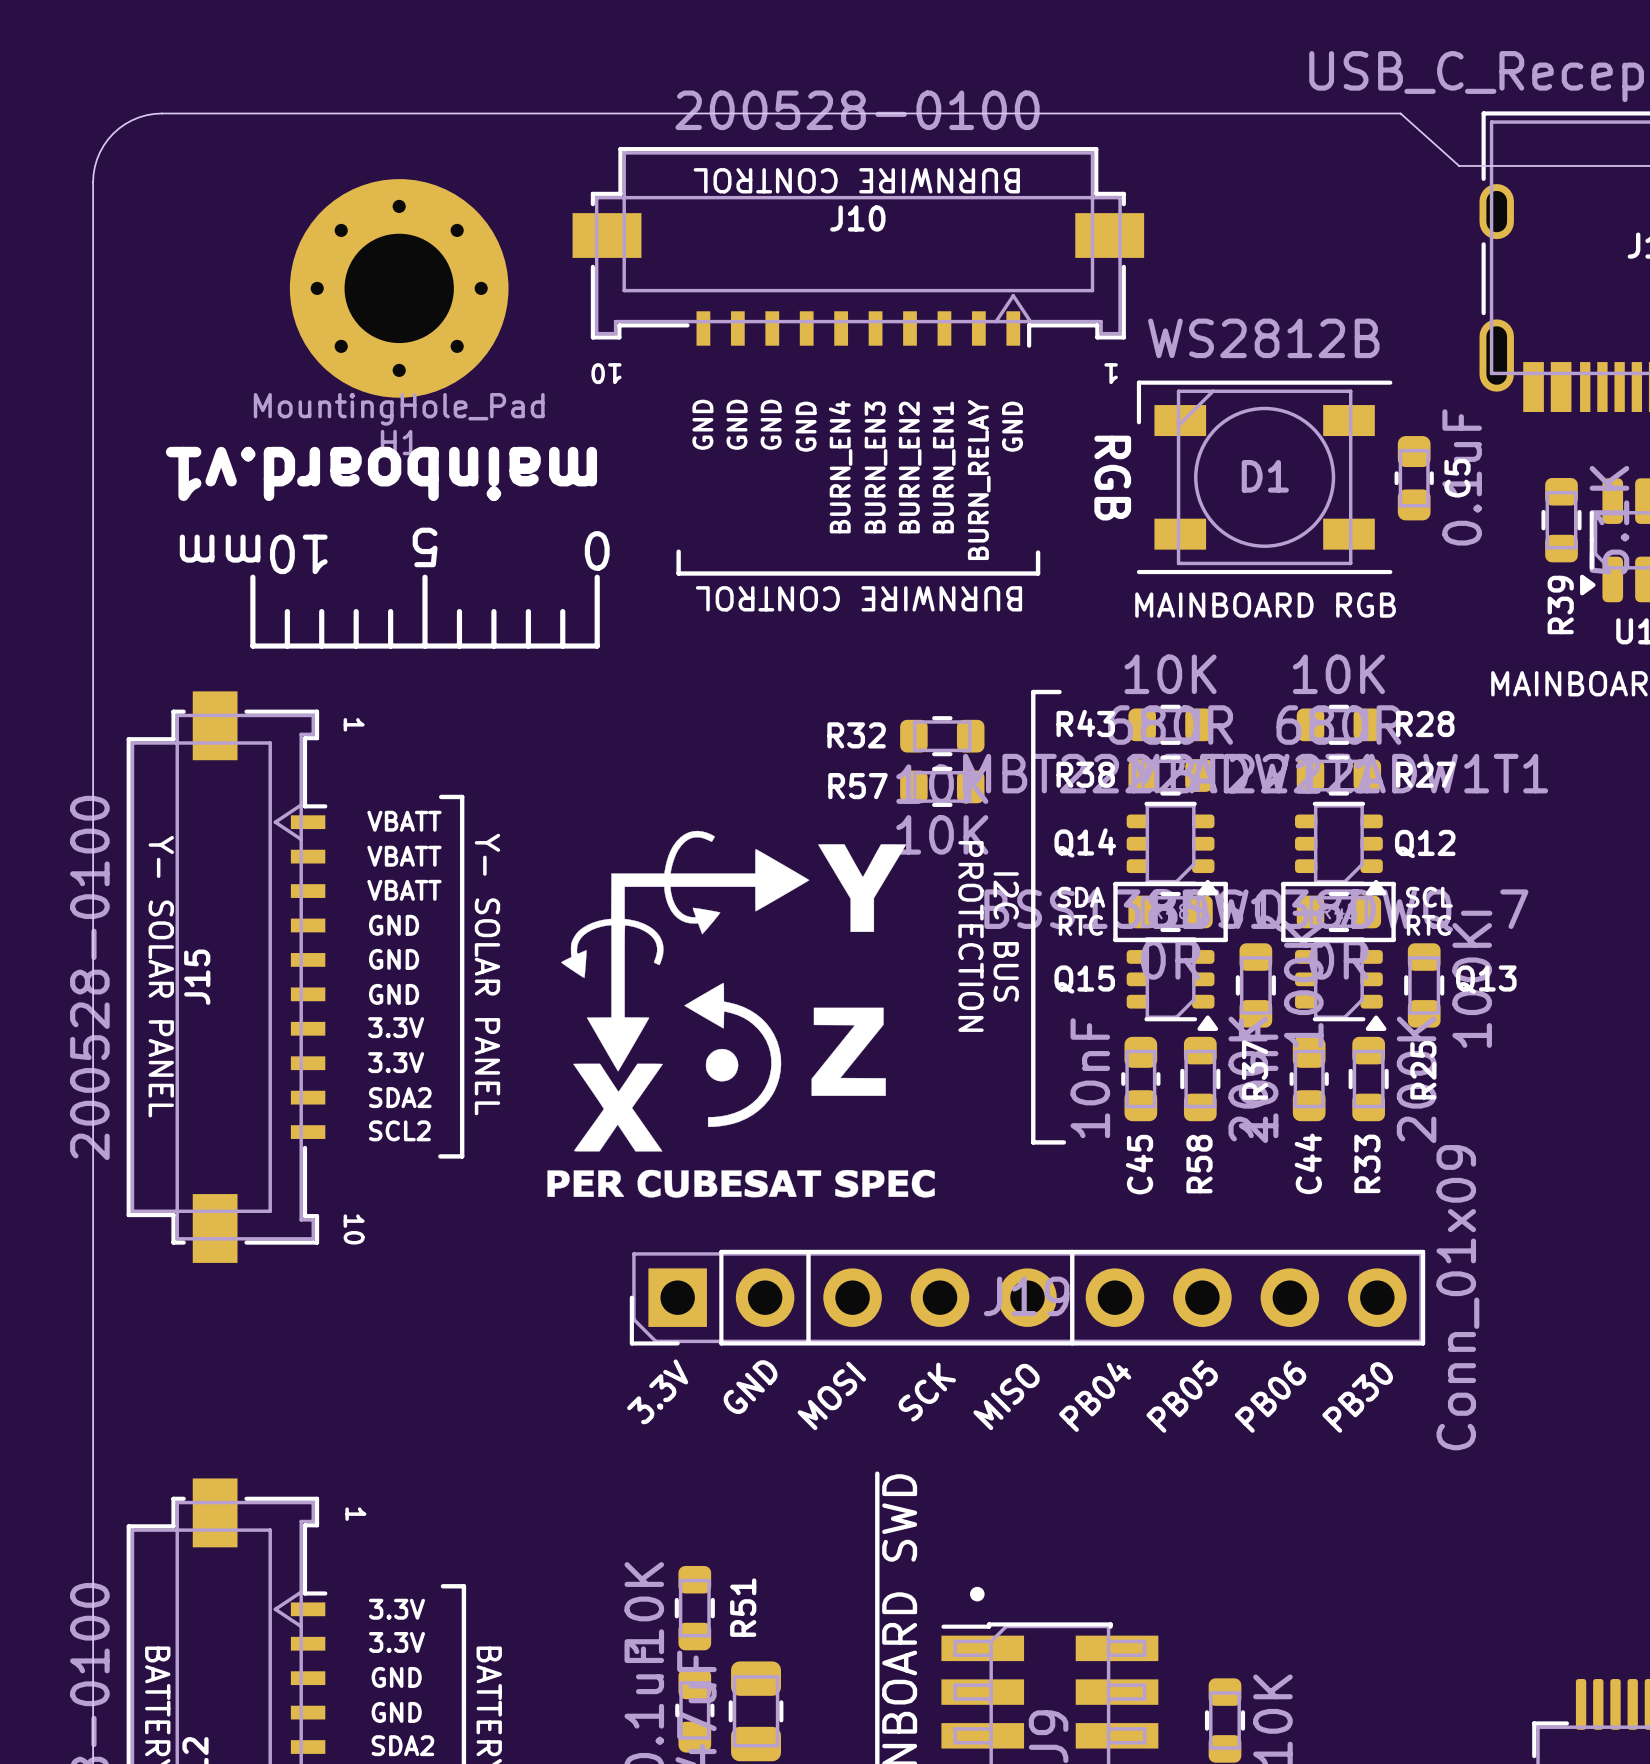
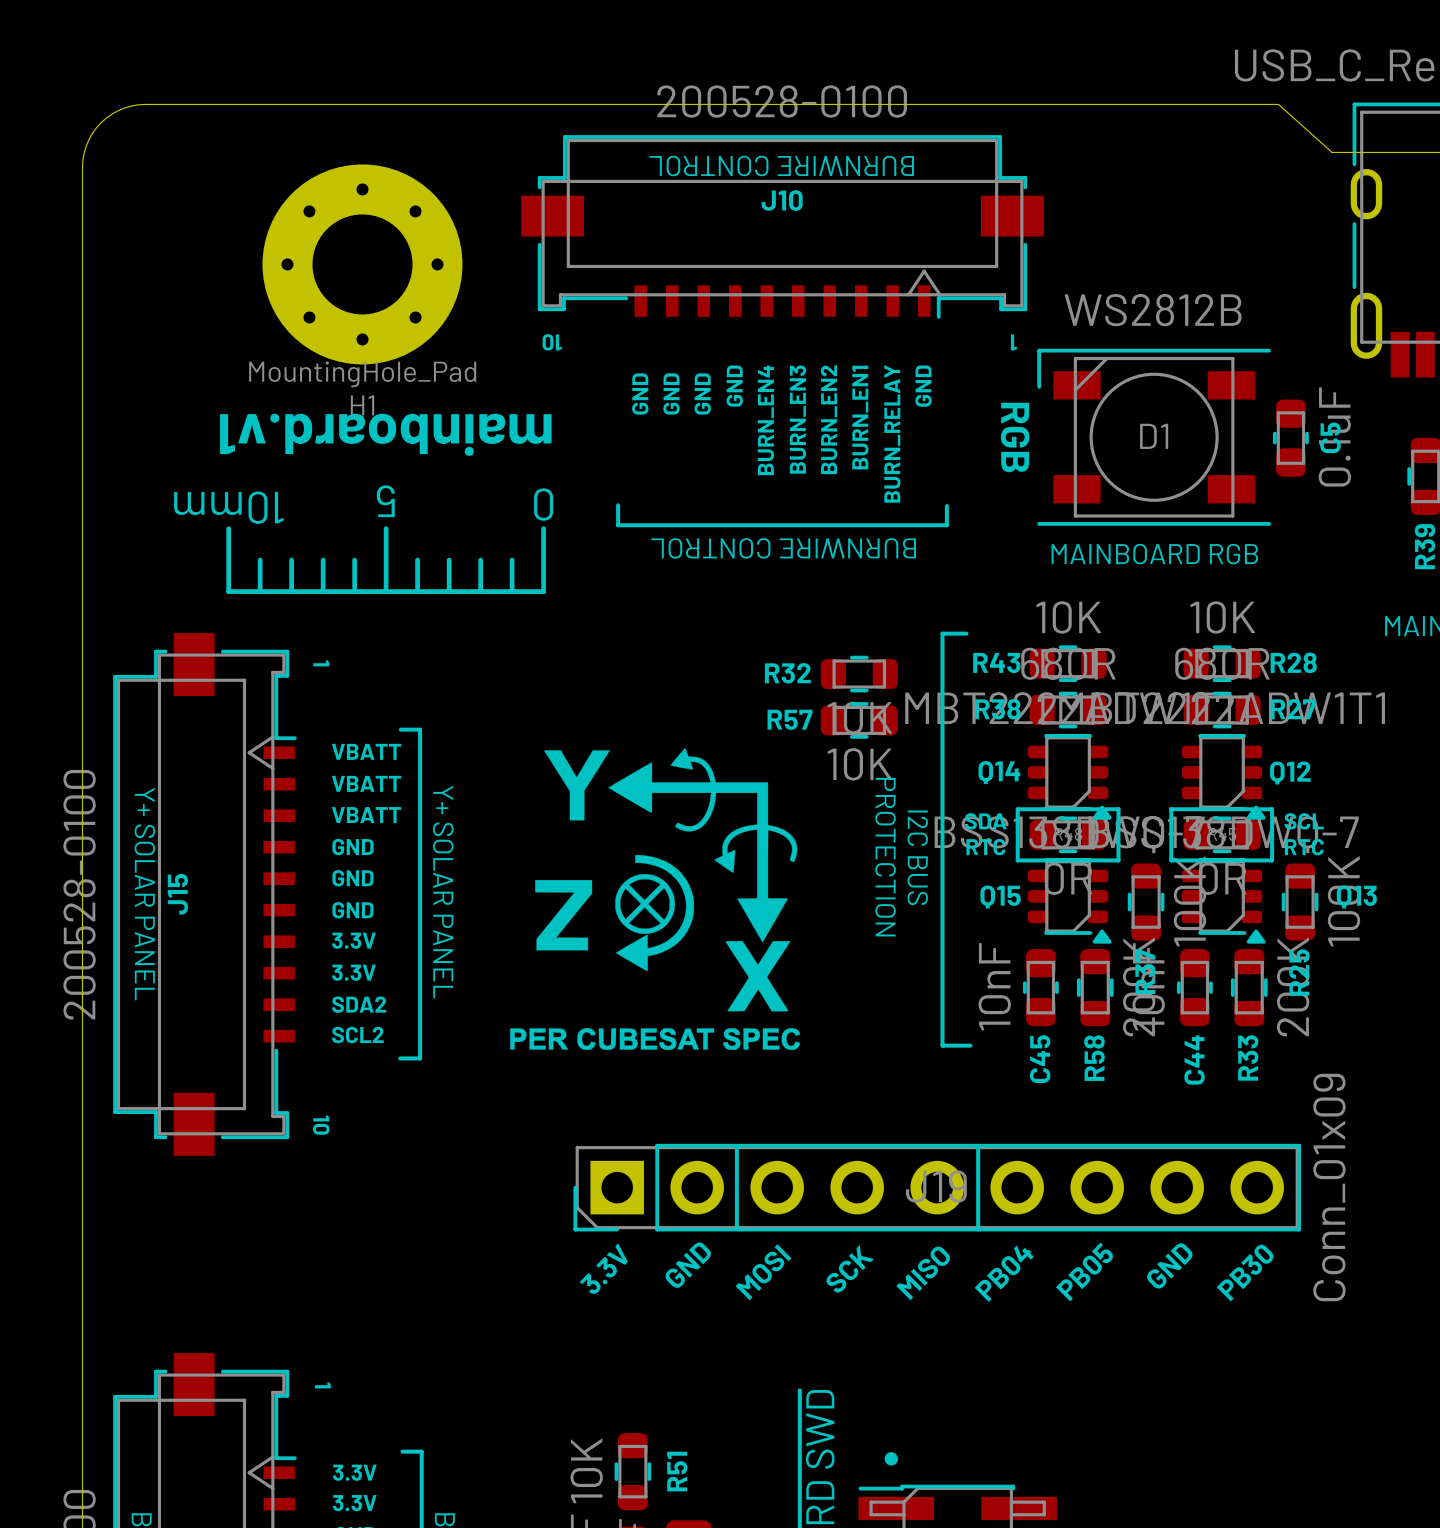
drawing: none -> [510, 748, 801, 1050]
drawing: [547, 830, 935, 1198] -> none
text: Y- SOLAR PANEL (487, 974) -> Y+ SOLAR PANEL (443, 892)
text: Y- SOLAR PANEL (161, 976) -> Y+ SOLAR PANEL (144, 894)
text: PB06 (1270, 1396) -> GND (1169, 1265)

